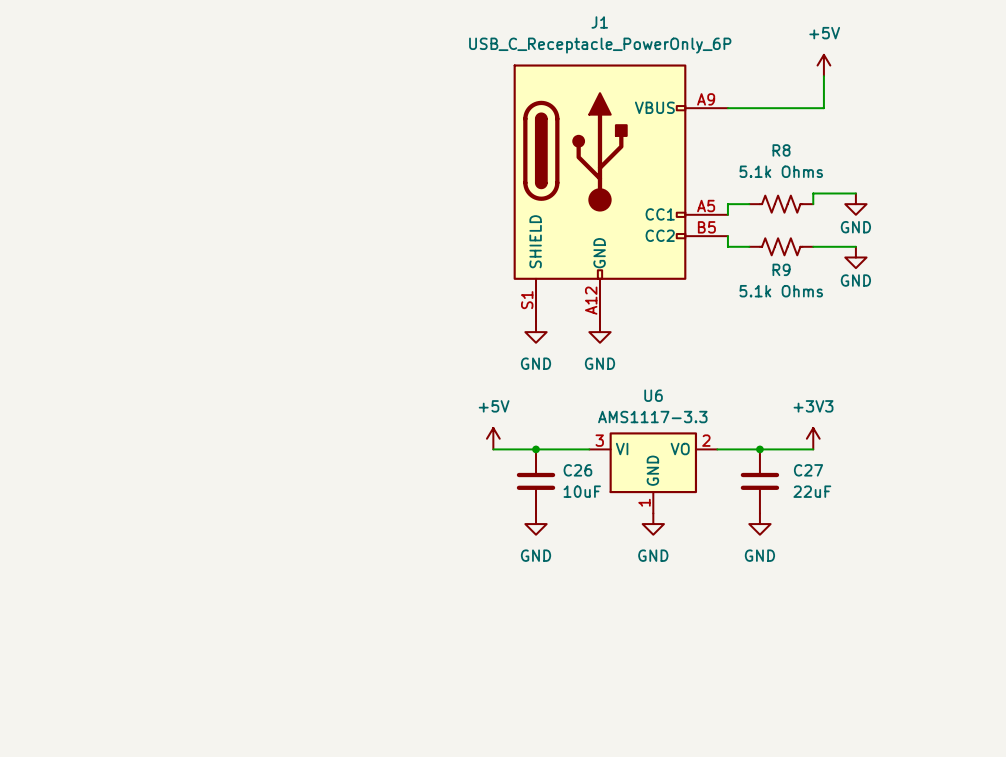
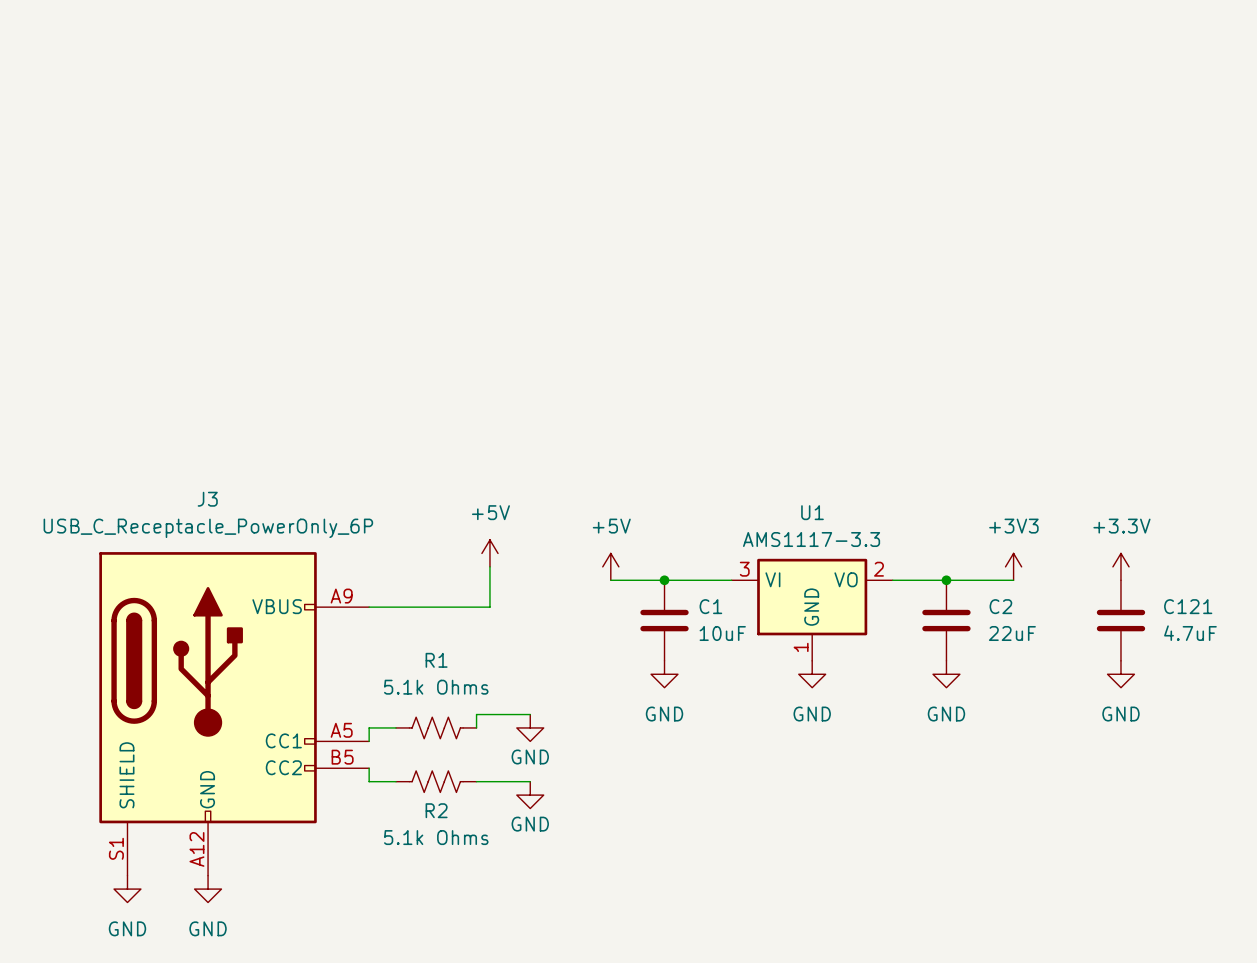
power symbol: +5V (823, 65) -> none
wire: (823, 76) (823, 108) (727, 108) -> none
J1: USB_C_Receptacle_PowerOnly_6P (620, 192) -> none
wire: (855, 193) (813, 193) (813, 204) -> none
wire: (749, 204) (727, 204) (727, 214) -> none
R8: 5.1k Ohms (781, 204) -> none
power symbol: GND (855, 204) -> none
wire: (727, 236) (727, 246) (749, 246) -> none
R9: 5.1k Ohms (781, 246) -> none
wire: (813, 246) (855, 246) -> none
power symbol: GND (855, 257) -> none
power symbol: GND (536, 332) -> none
power symbol: GND (599, 332) -> none
U6 name: U6 (653, 395) -> U1 (812, 512)
power symbol: none -> +5V (489, 553)
wire: none -> (489, 566) (489, 607) (369, 607)
power symbol: none -> +3.3V (1120, 566)
C26 name: C26 (577, 470) -> C1 (710, 606)
C27 name: C27 (808, 470) -> C2 (1000, 606)
C121: none -> 4.7uF (1120, 620)
power symbol: none -> GND (1120, 674)
J3: none -> USB_C_Receptacle_PowerOnly_6P (234, 713)
wire: none -> (530, 714) (476, 714) (476, 727)
wire: none -> (396, 727) (369, 727) (369, 741)
R1: none -> 5.1k Ohms (436, 727)
power symbol: none -> GND (530, 727)
wire: none -> (369, 768) (369, 781) (396, 781)
R2: none -> 5.1k Ohms (436, 781)
wire: none -> (476, 781) (530, 781)
power symbol: none -> GND (530, 795)
power symbol: none -> GND (127, 889)
power symbol: none -> GND (208, 889)

